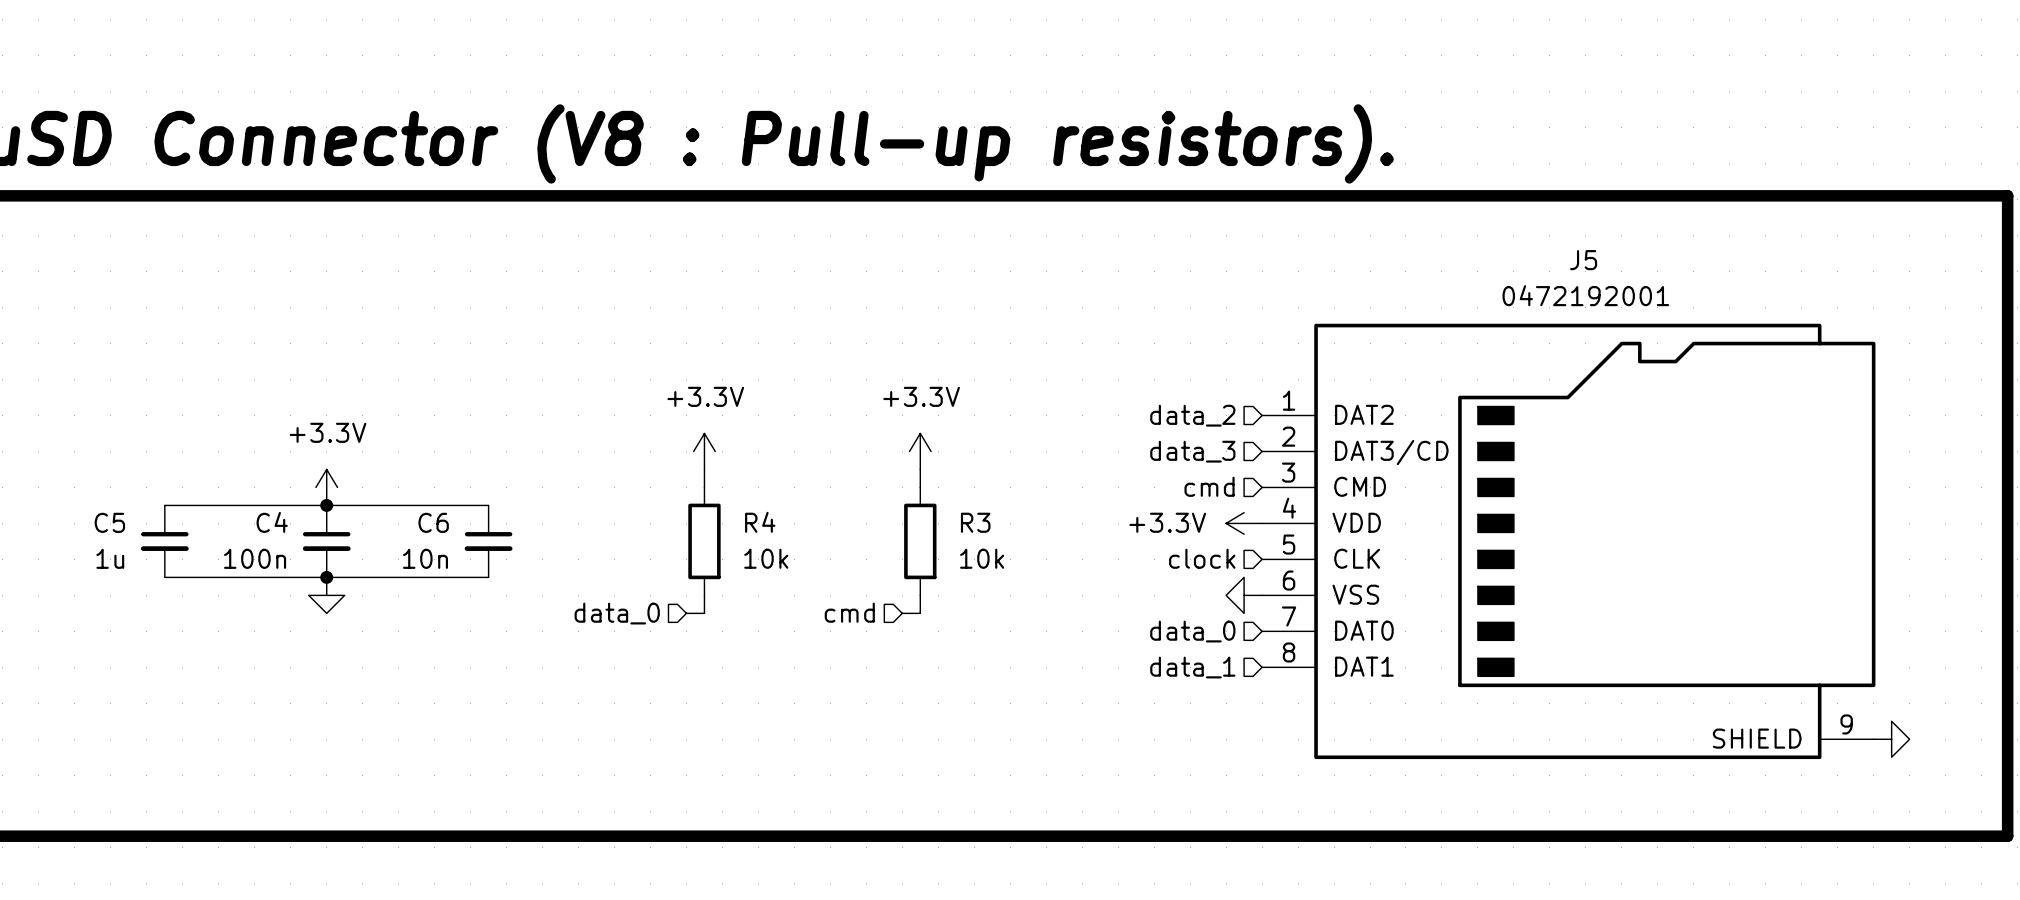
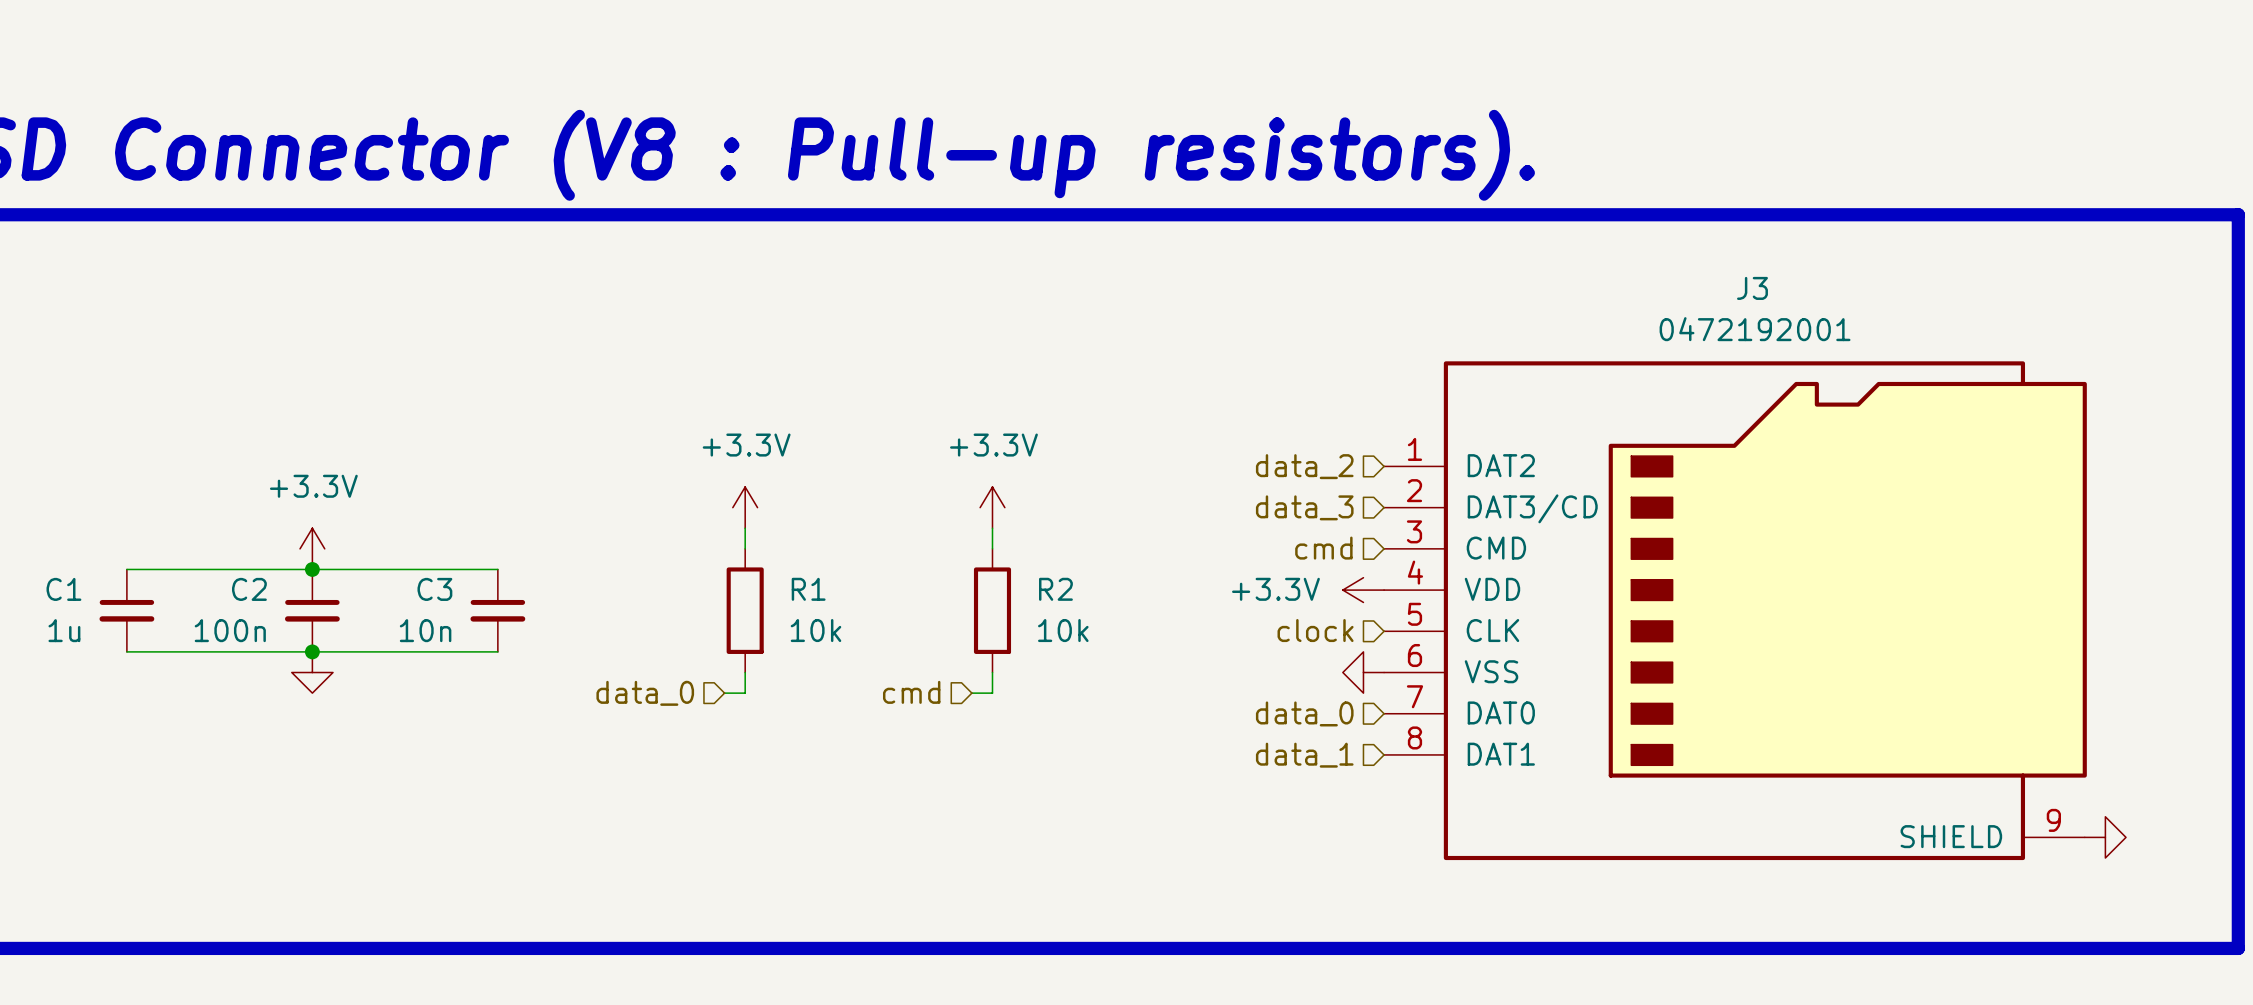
J5 name: J5 (1583, 260) -> J3 (1752, 288)
C5 name: C5 (109, 522) -> C1 (63, 589)
C4 name: C4 (272, 522) -> C2 (249, 589)
C6 name: C6 (433, 522) -> C3 (434, 589)
R4 name: R4 (760, 522) -> R1 (808, 589)
R3 name: R3 (975, 522) -> R2 (1055, 589)

